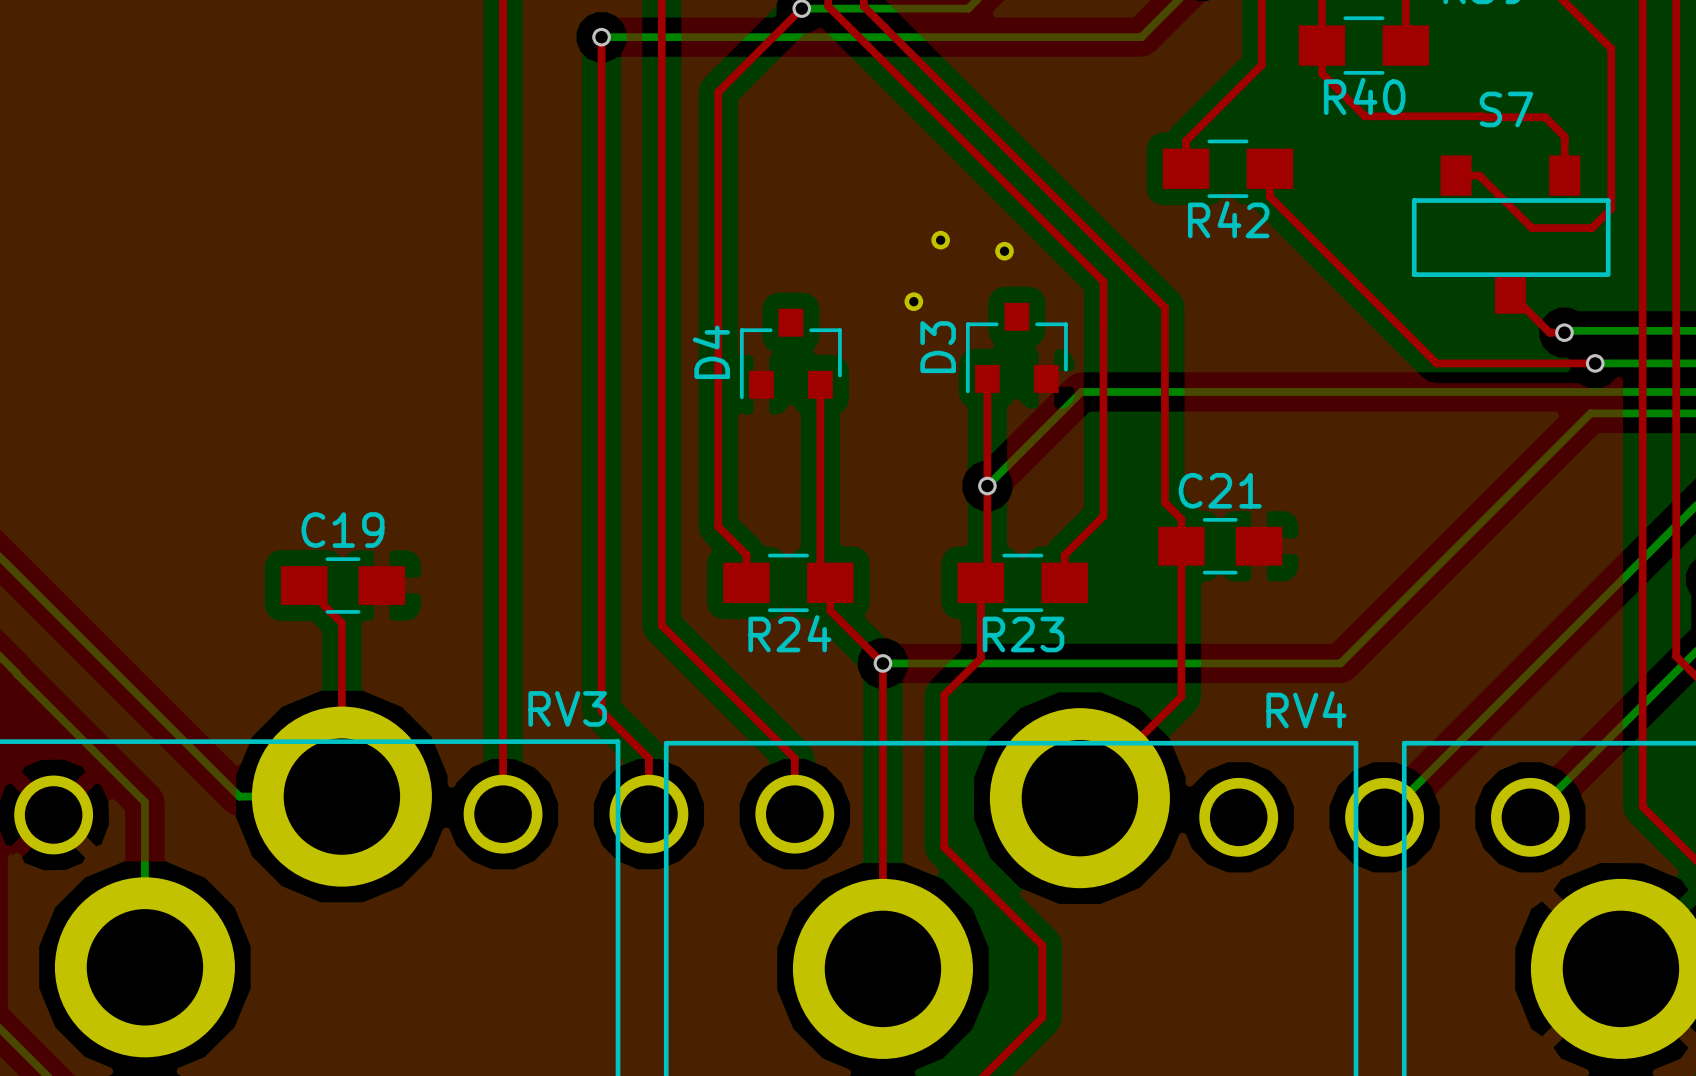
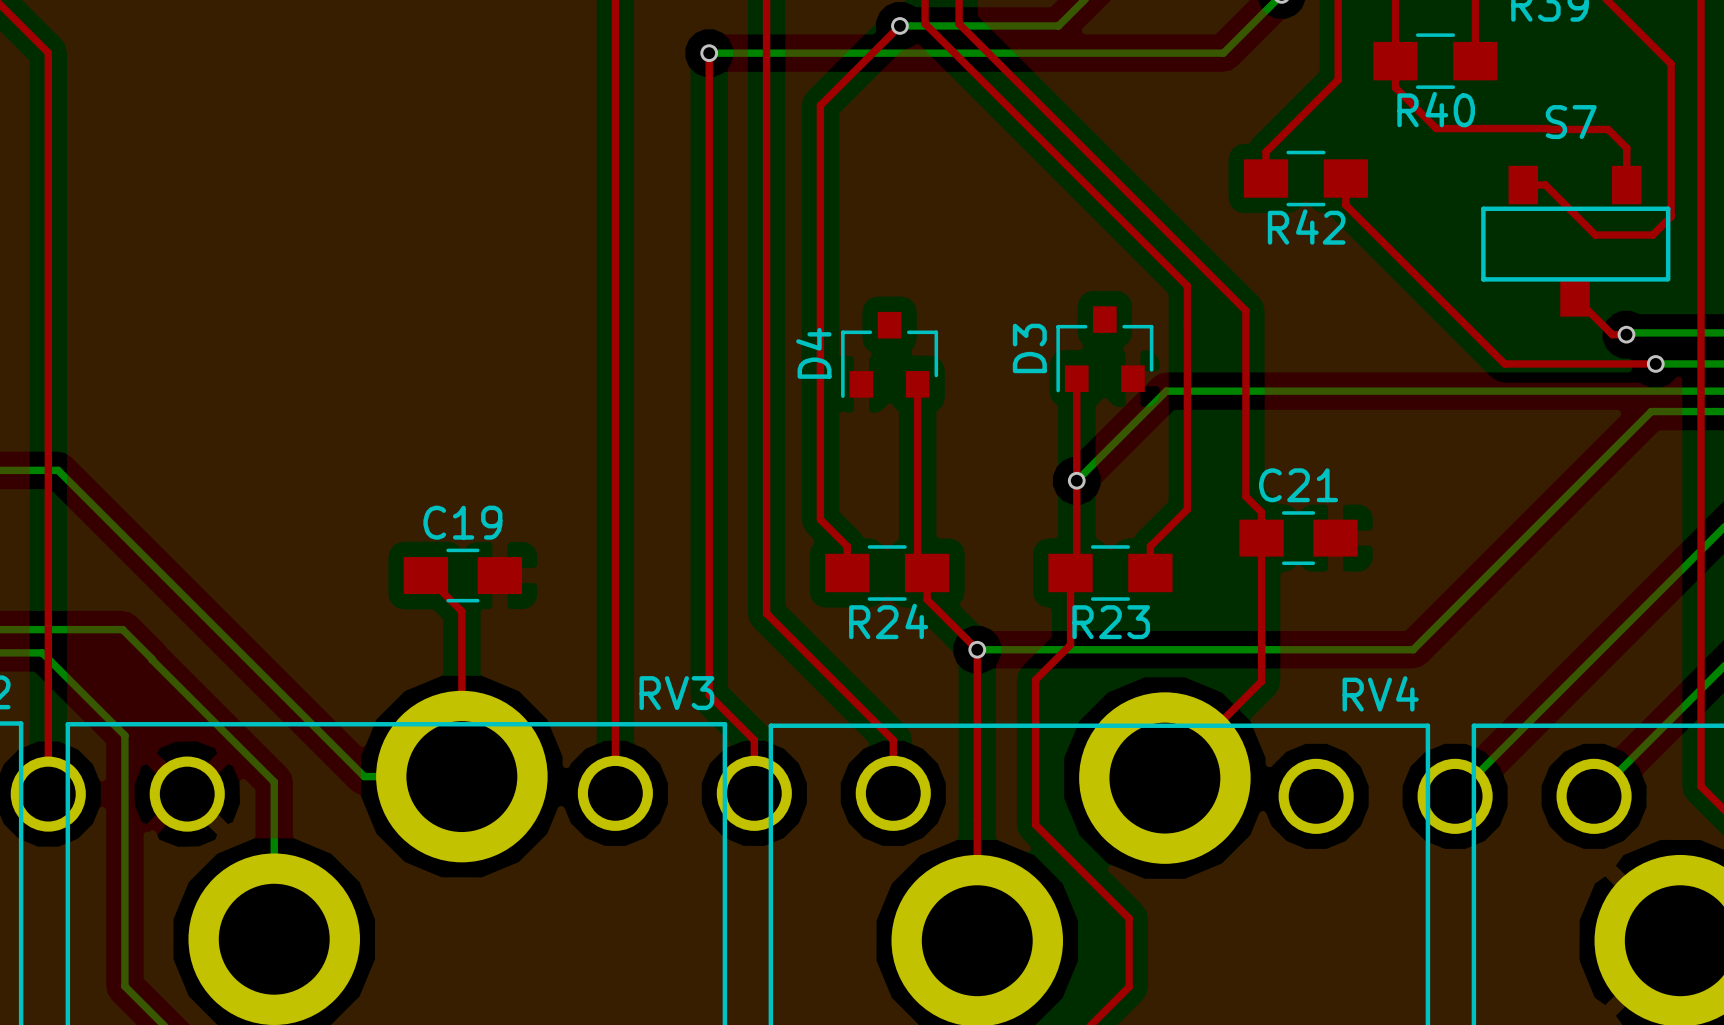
part: (940, 240) -> none
part: (1004, 251) -> none
part: (913, 301) -> none

